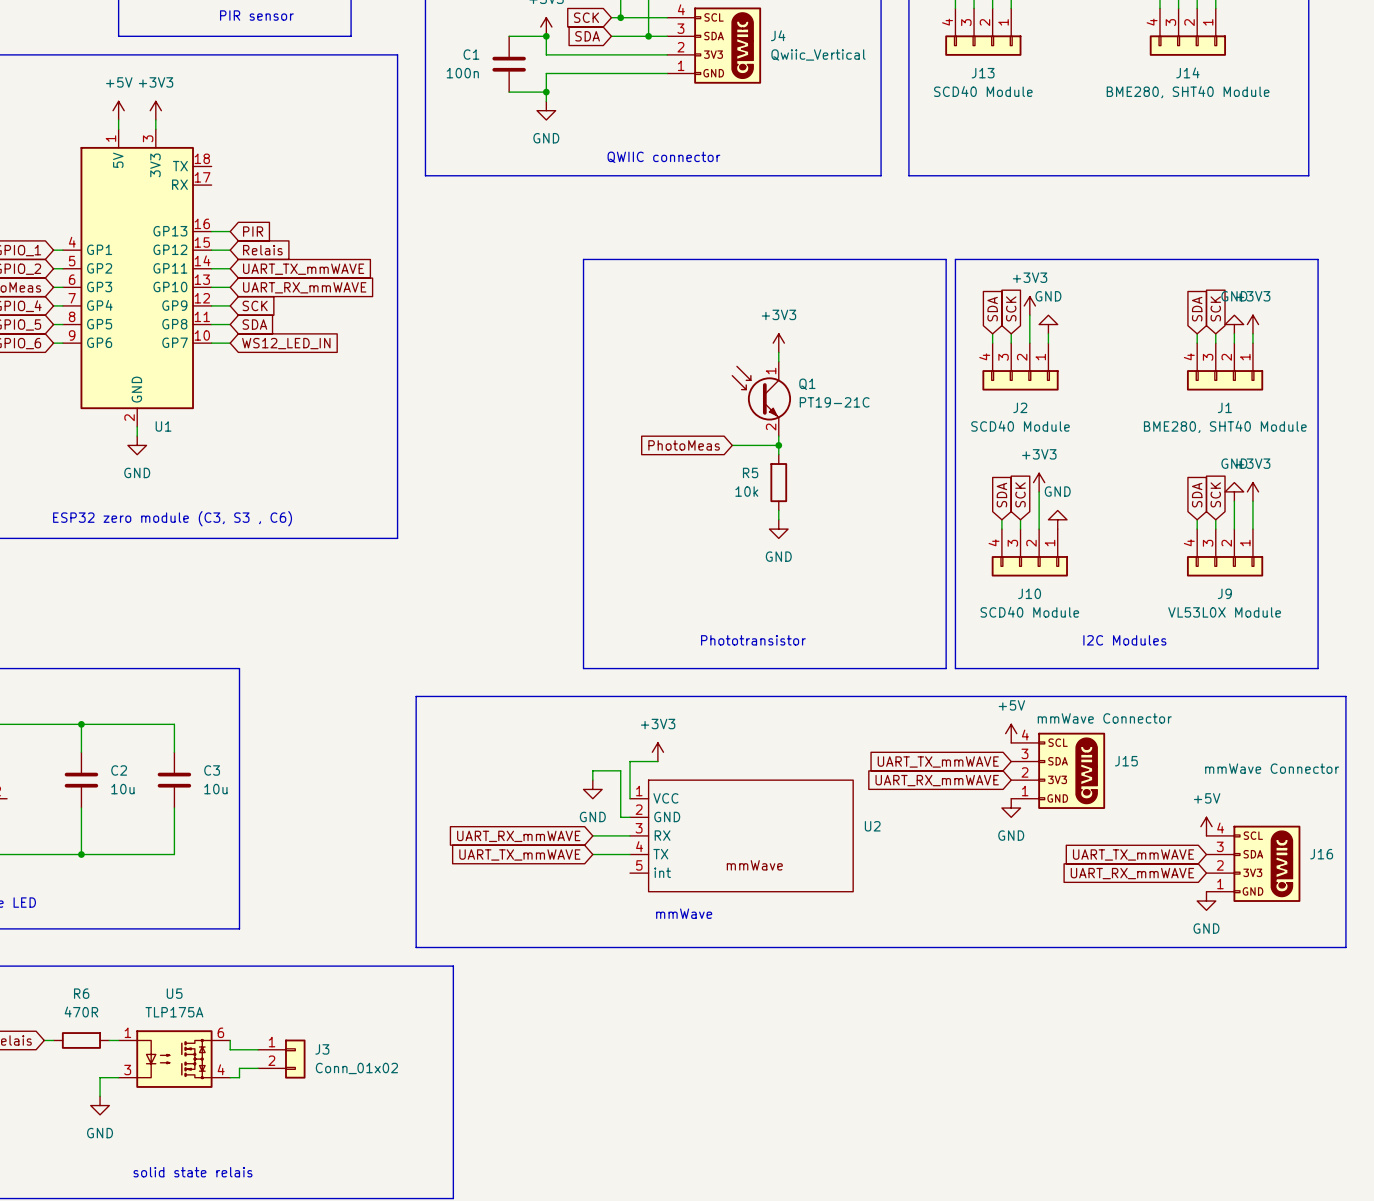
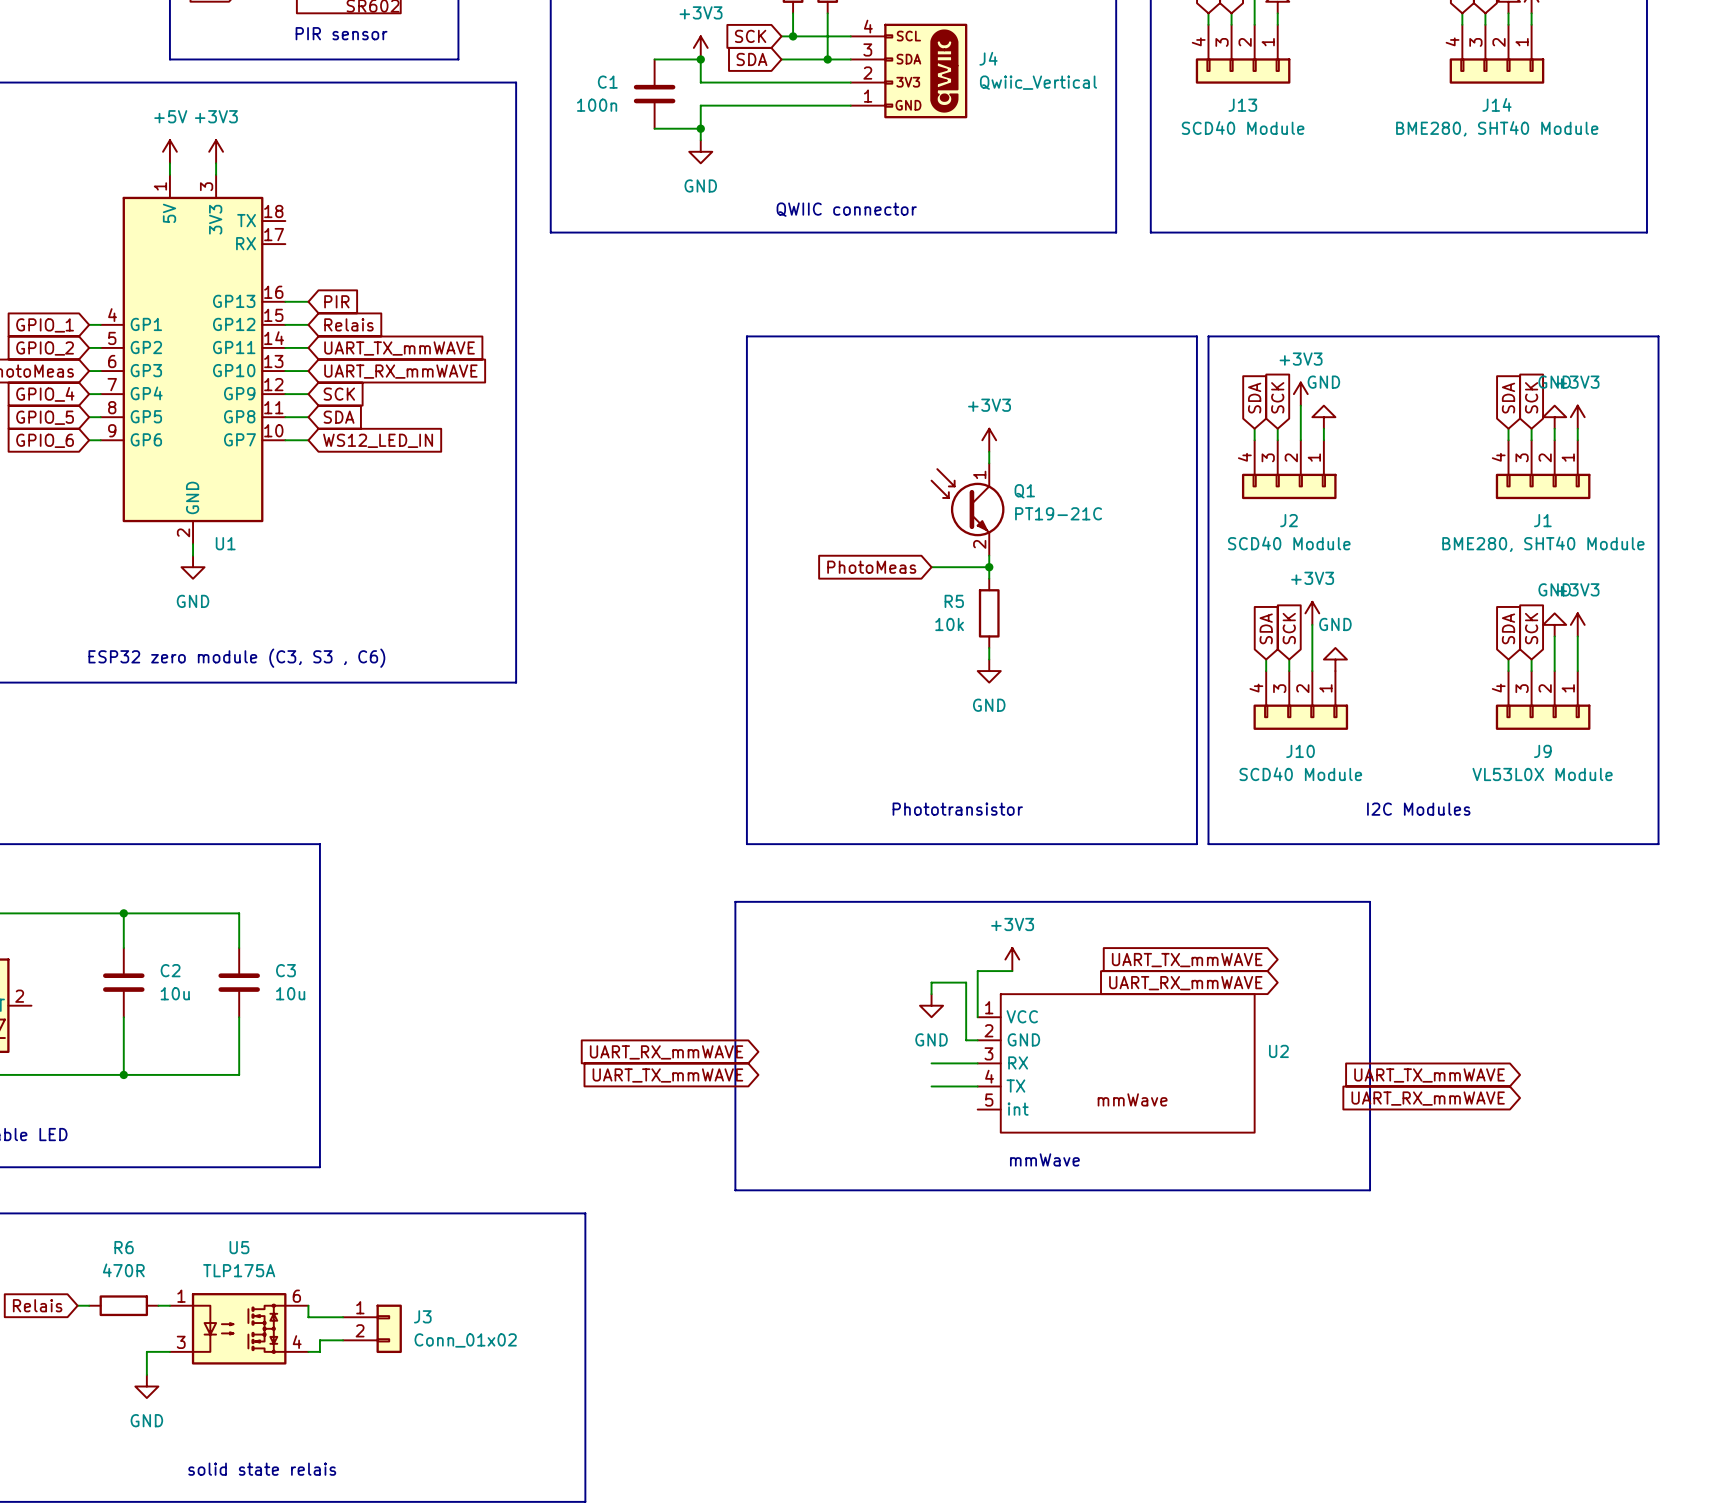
power symbol: +5V (1011, 733) -> none
power symbol position: +3V3 (657, 752) -> +3V3 (1012, 959)
wire: (657, 761) (630, 761) (630, 798) -> (1012, 971) (977, 971) (977, 1017)
J15: mmWave Connector (1058, 770) -> none
wire: (592, 780) (592, 770) (620, 770) (620, 817) (630, 817) -> (931, 994) (931, 982) (966, 982) (966, 1040) (977, 1040)
power symbol: GND (592, 789) -> none
power symbol: none -> GND (931, 1005)
power symbol: GND (1011, 808) -> none
power symbol: +5V (1206, 826) -> none
wire: (592, 835) (630, 835) -> (931, 1063) (977, 1063)
U2 position: (741, 835) -> (1116, 1063)
wire: (592, 854) (630, 854) -> (931, 1086) (977, 1086)
J16: mmWave Connector (1253, 863) -> none
power symbol: GND (1206, 901) -> none
text position: mmWave (684, 913) -> mmWave (1044, 1159)
line: (574, 947) (416, 947) (416, 696) (1345, 696) (1345, 947) (1085, 947) -> (735, 1190) (735, 901) (1370, 901) (1370, 1190)

